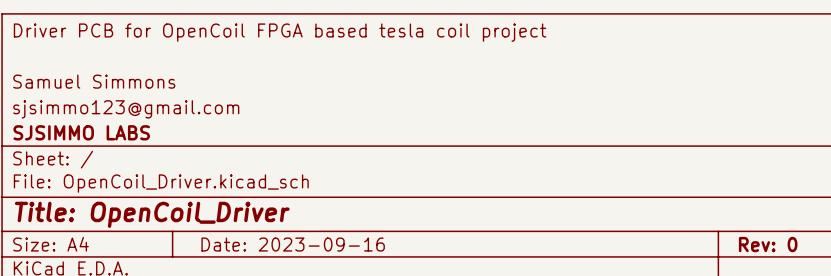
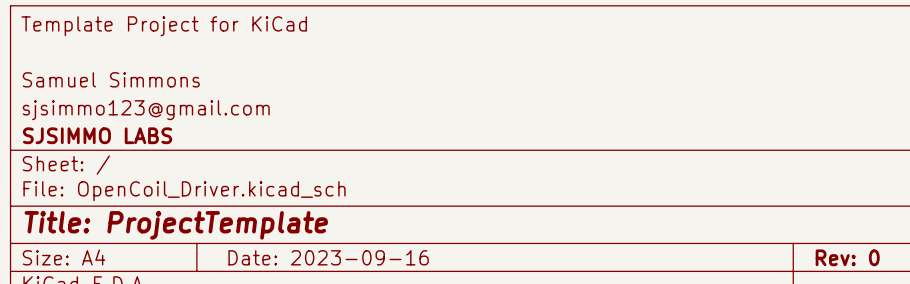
title block: Driver PCB for OpenCoil FPGA based tesla coil project (280, 32) -> Template Project for KiCad (164, 26)
title block: Title: OpenCoil_Driver (152, 214) -> Title: ProjectTemplate (176, 225)

